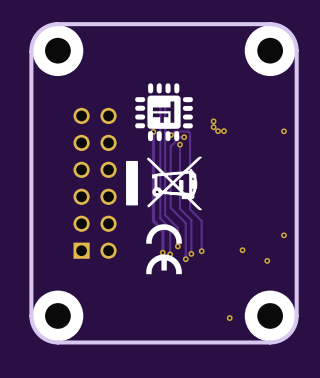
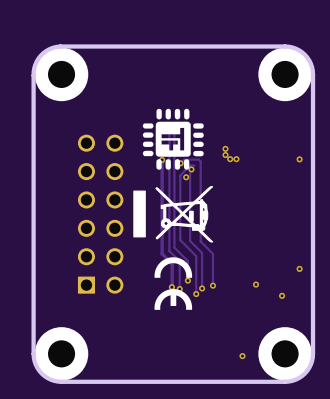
via: (184, 137) -> none
via: none -> (191, 169)
via: (179, 144) -> none
via: none -> (186, 177)

